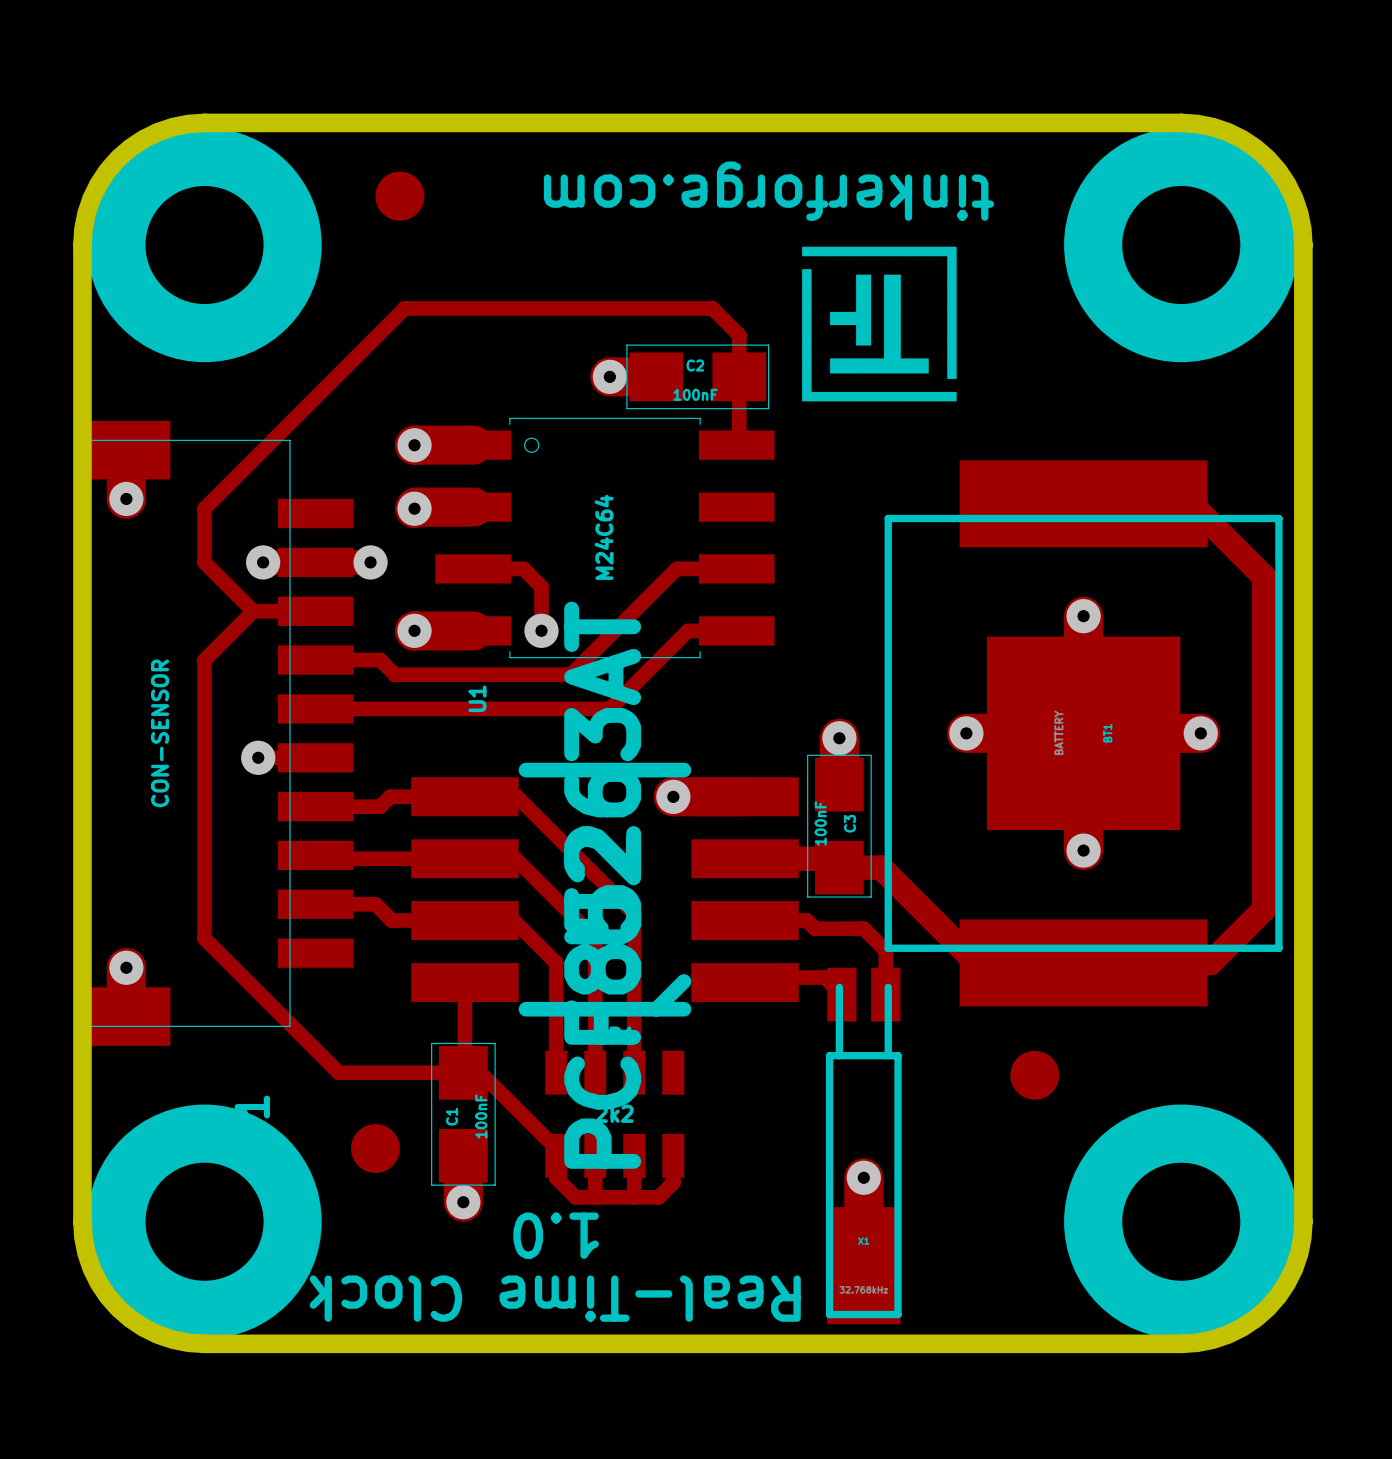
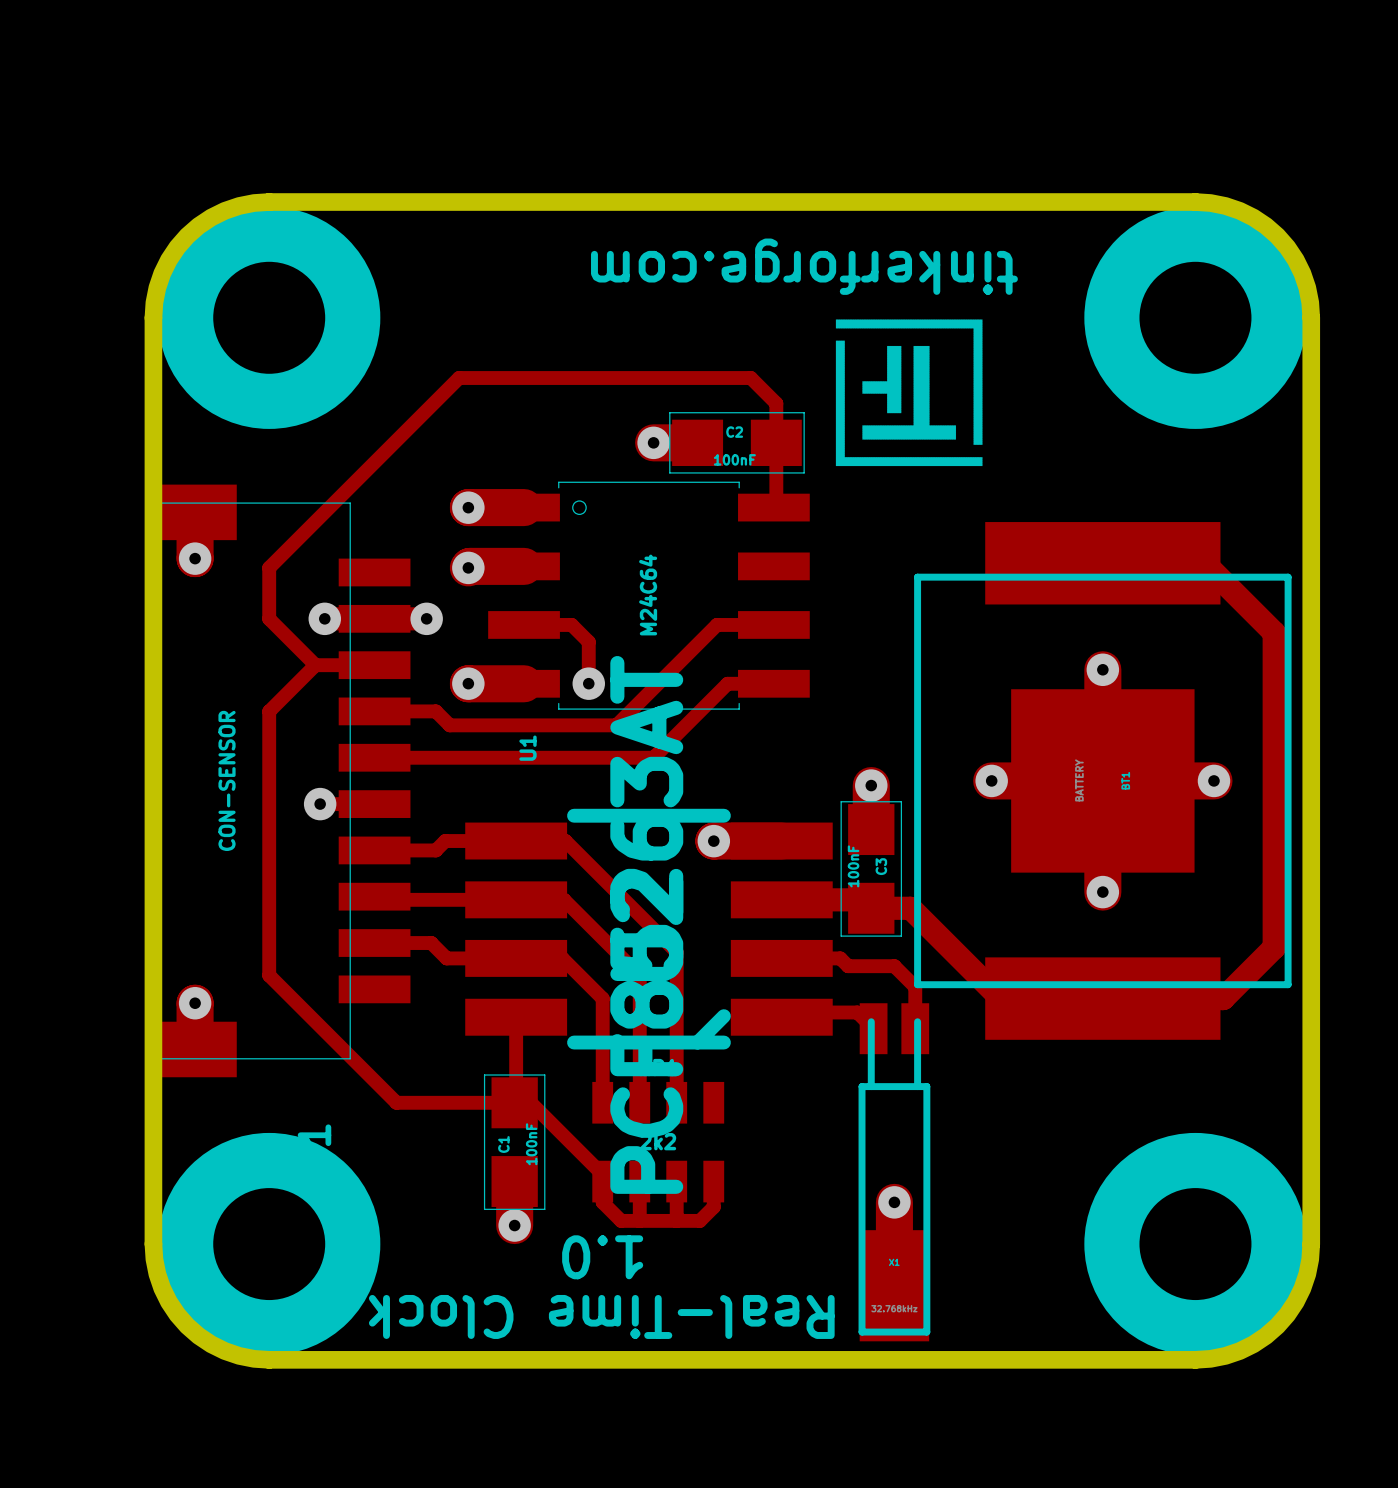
part: (399, 196) -> none
part: (1034, 1075) -> none
part: (375, 1148) -> none

